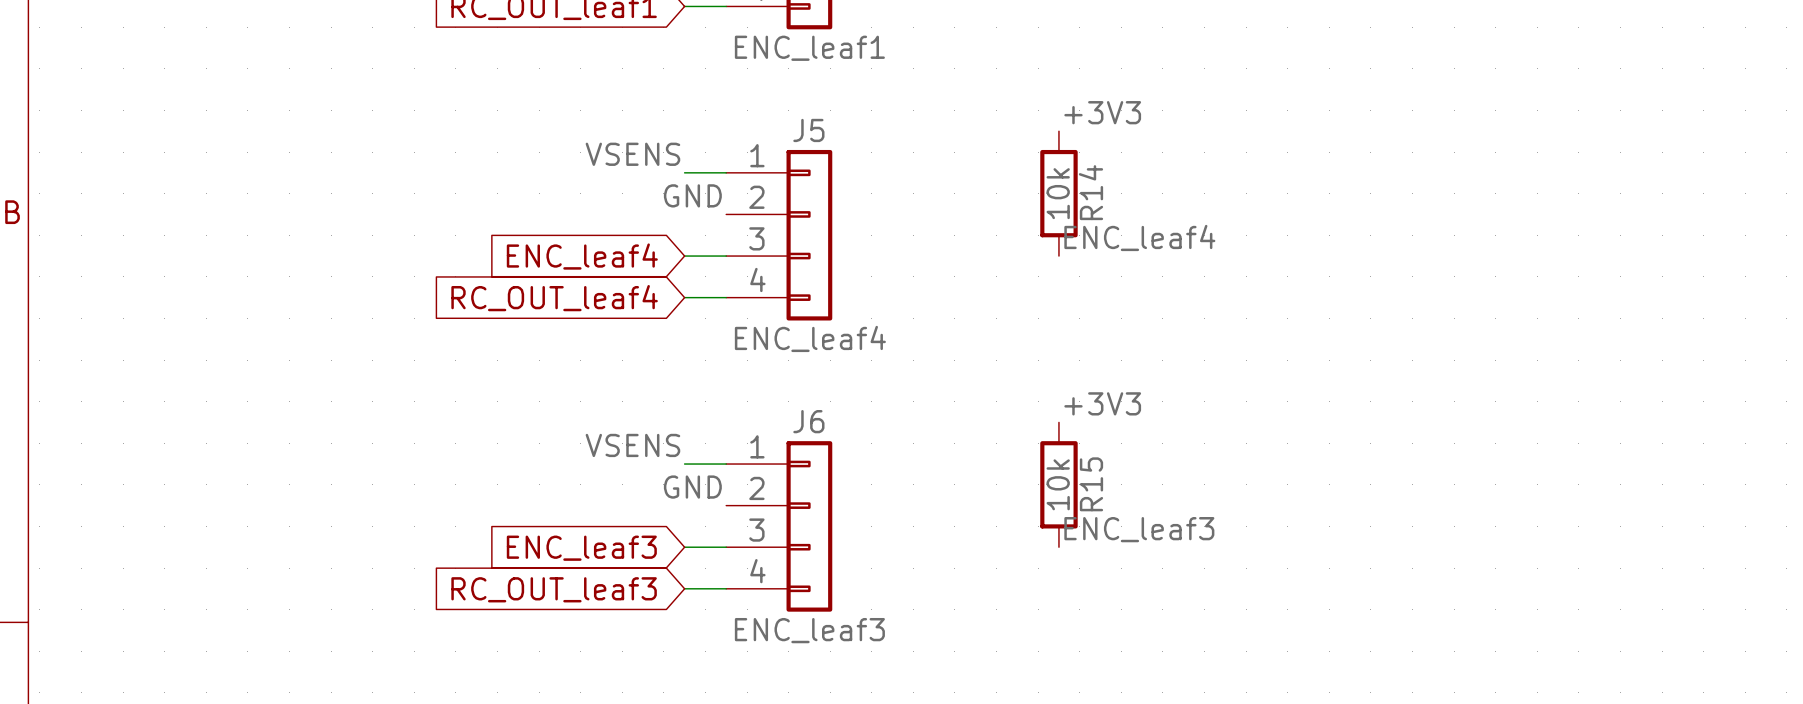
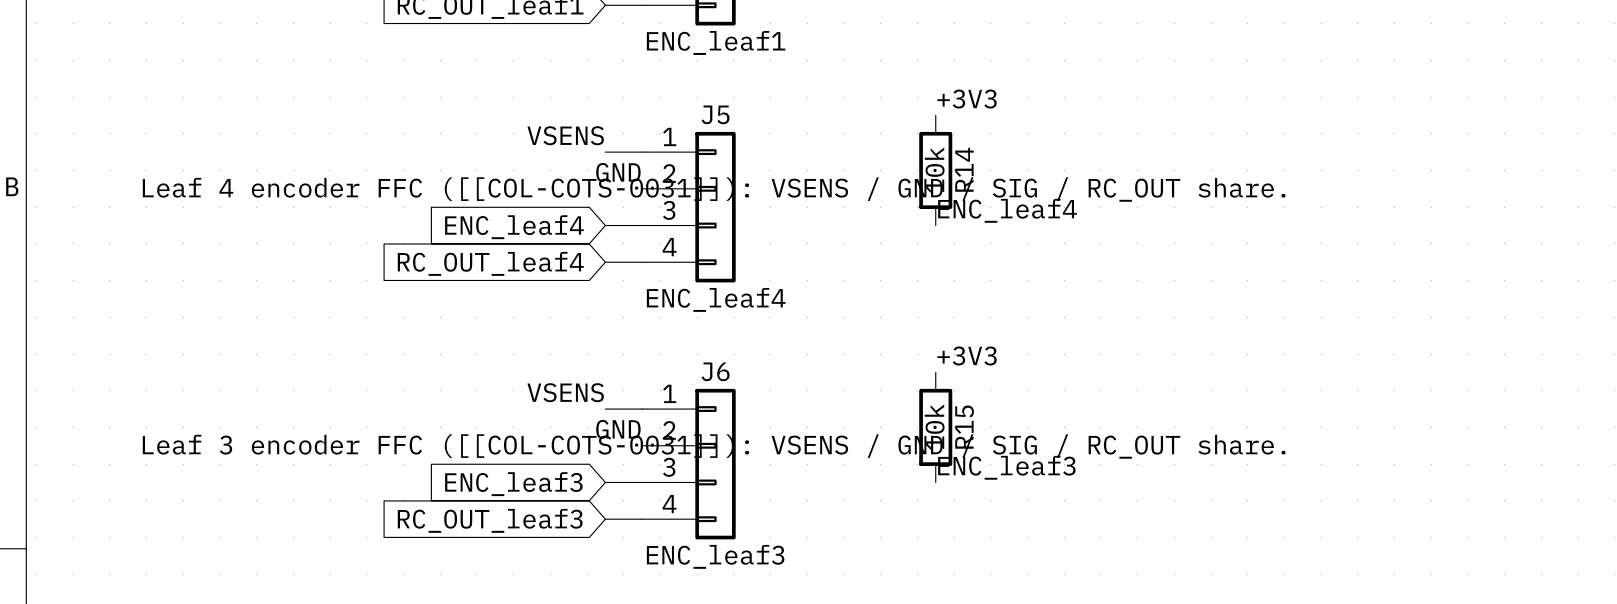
J5 text: none -> Leaf 4 encoder FFC ([[COL-COTS-0031]]): VSENS / GND / SIG / RC_OUT share. (714, 189)
J6 text: none -> Leaf 3 encoder FFC ([[COL-COTS-0031]]): VSENS / GND / SIG / RC_OUT share. (714, 446)

